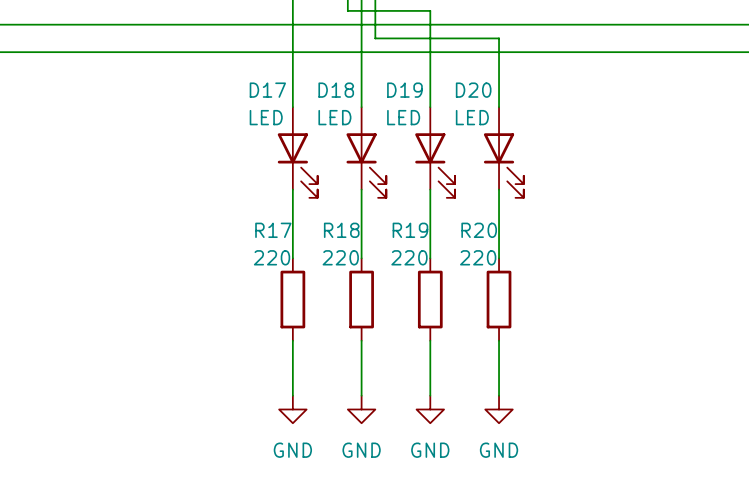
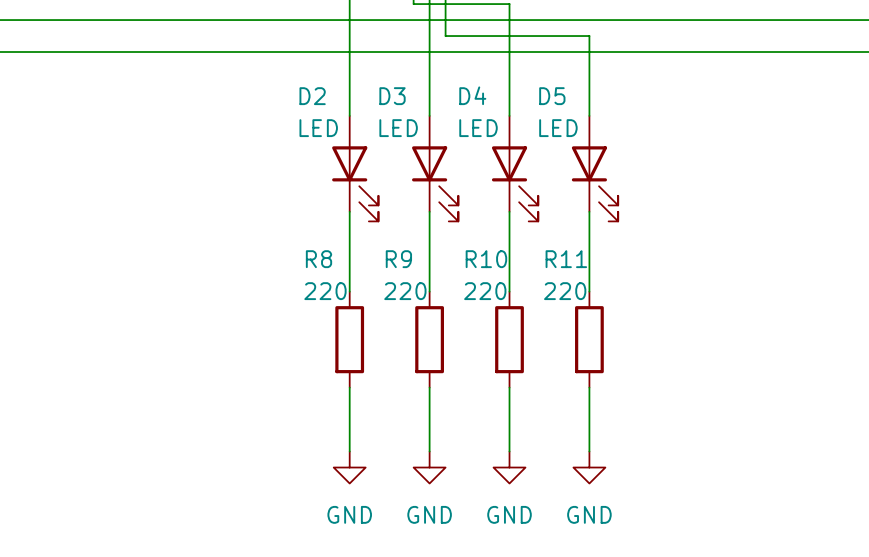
D17 name: D17 (267, 90) -> D2 (312, 96)
D18 name: D18 (336, 90) -> D3 (392, 96)
D19 name: D19 (404, 90) -> D4 (472, 95)
D20 name: D20 (473, 90) -> D5 (552, 96)
R17 name: R17 (273, 230) -> R8 (318, 259)
R18 name: R18 (341, 230) -> R9 (398, 259)
R19 name: R19 (410, 230) -> R10 (486, 259)
R20 name: R20 (479, 230) -> R11 (566, 259)

